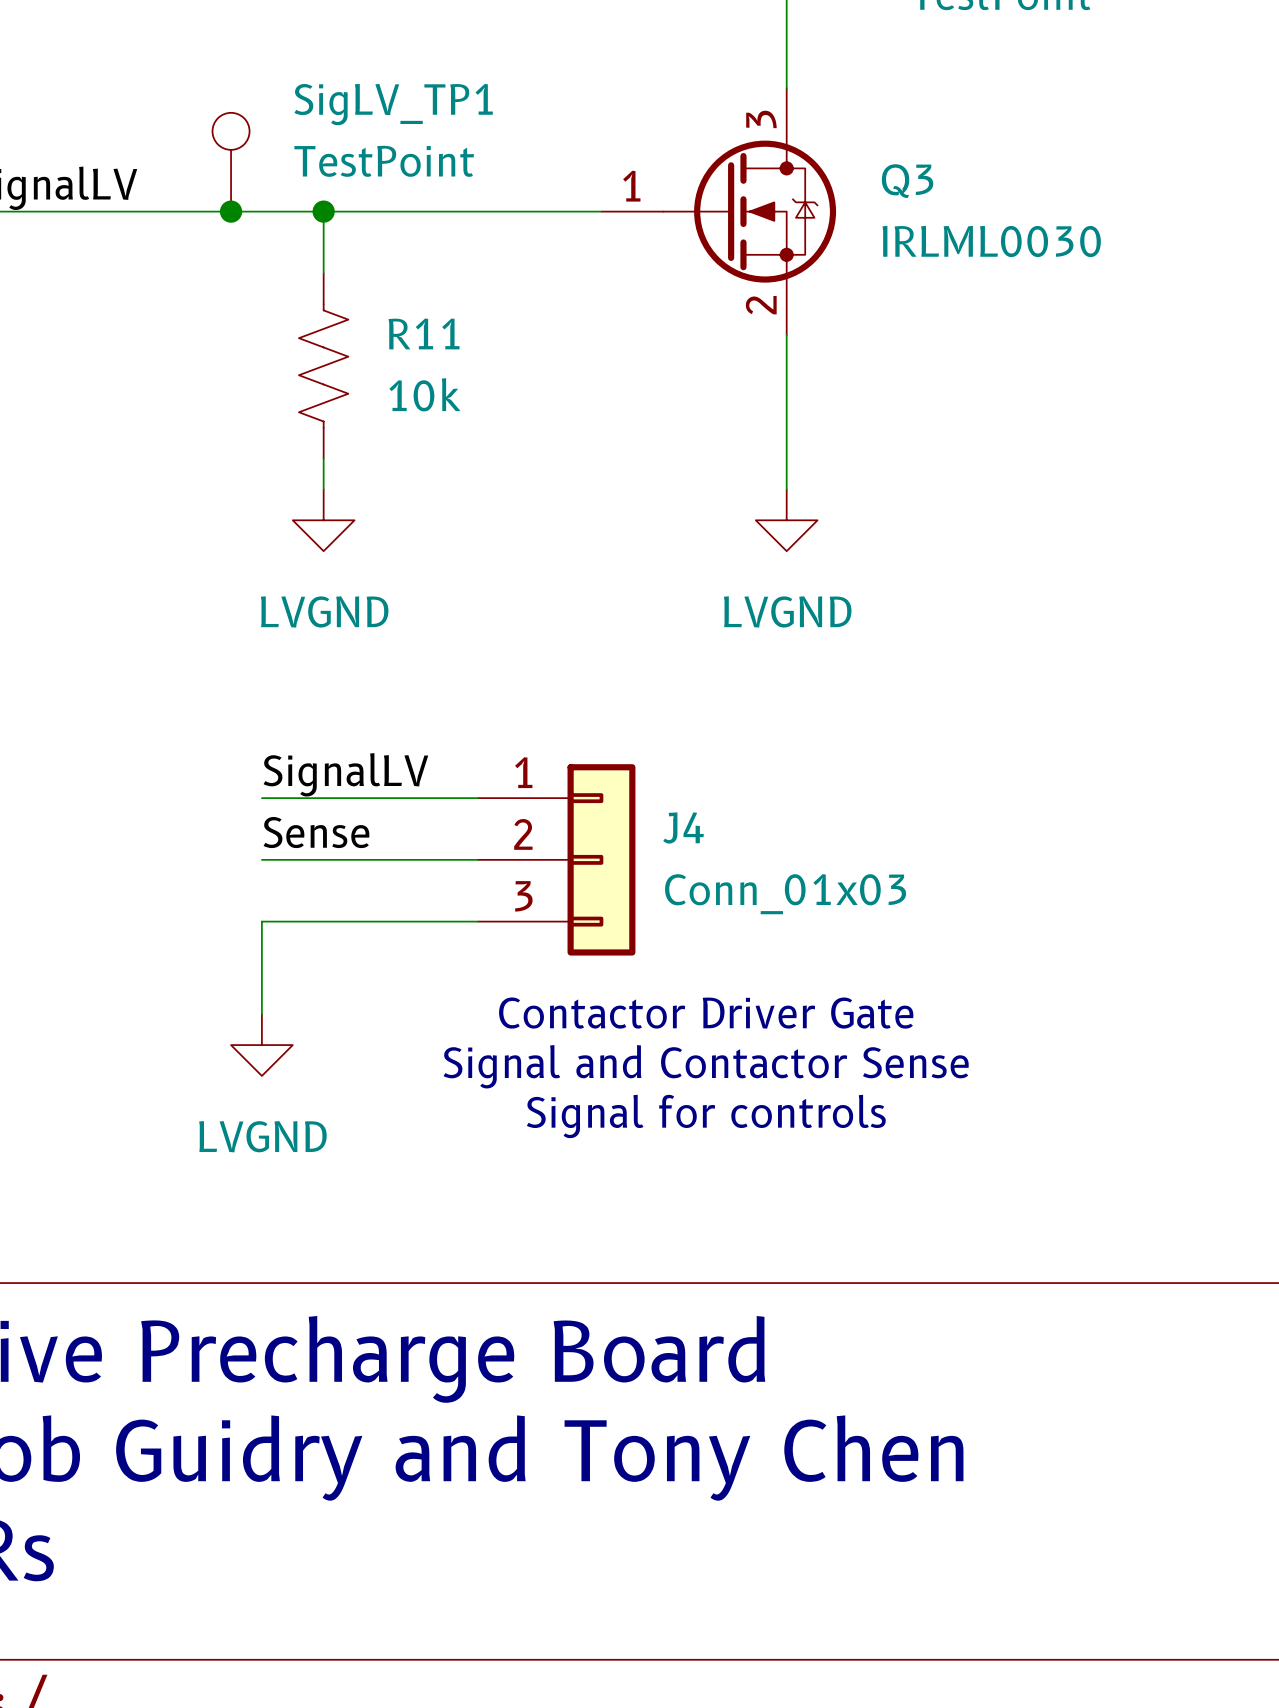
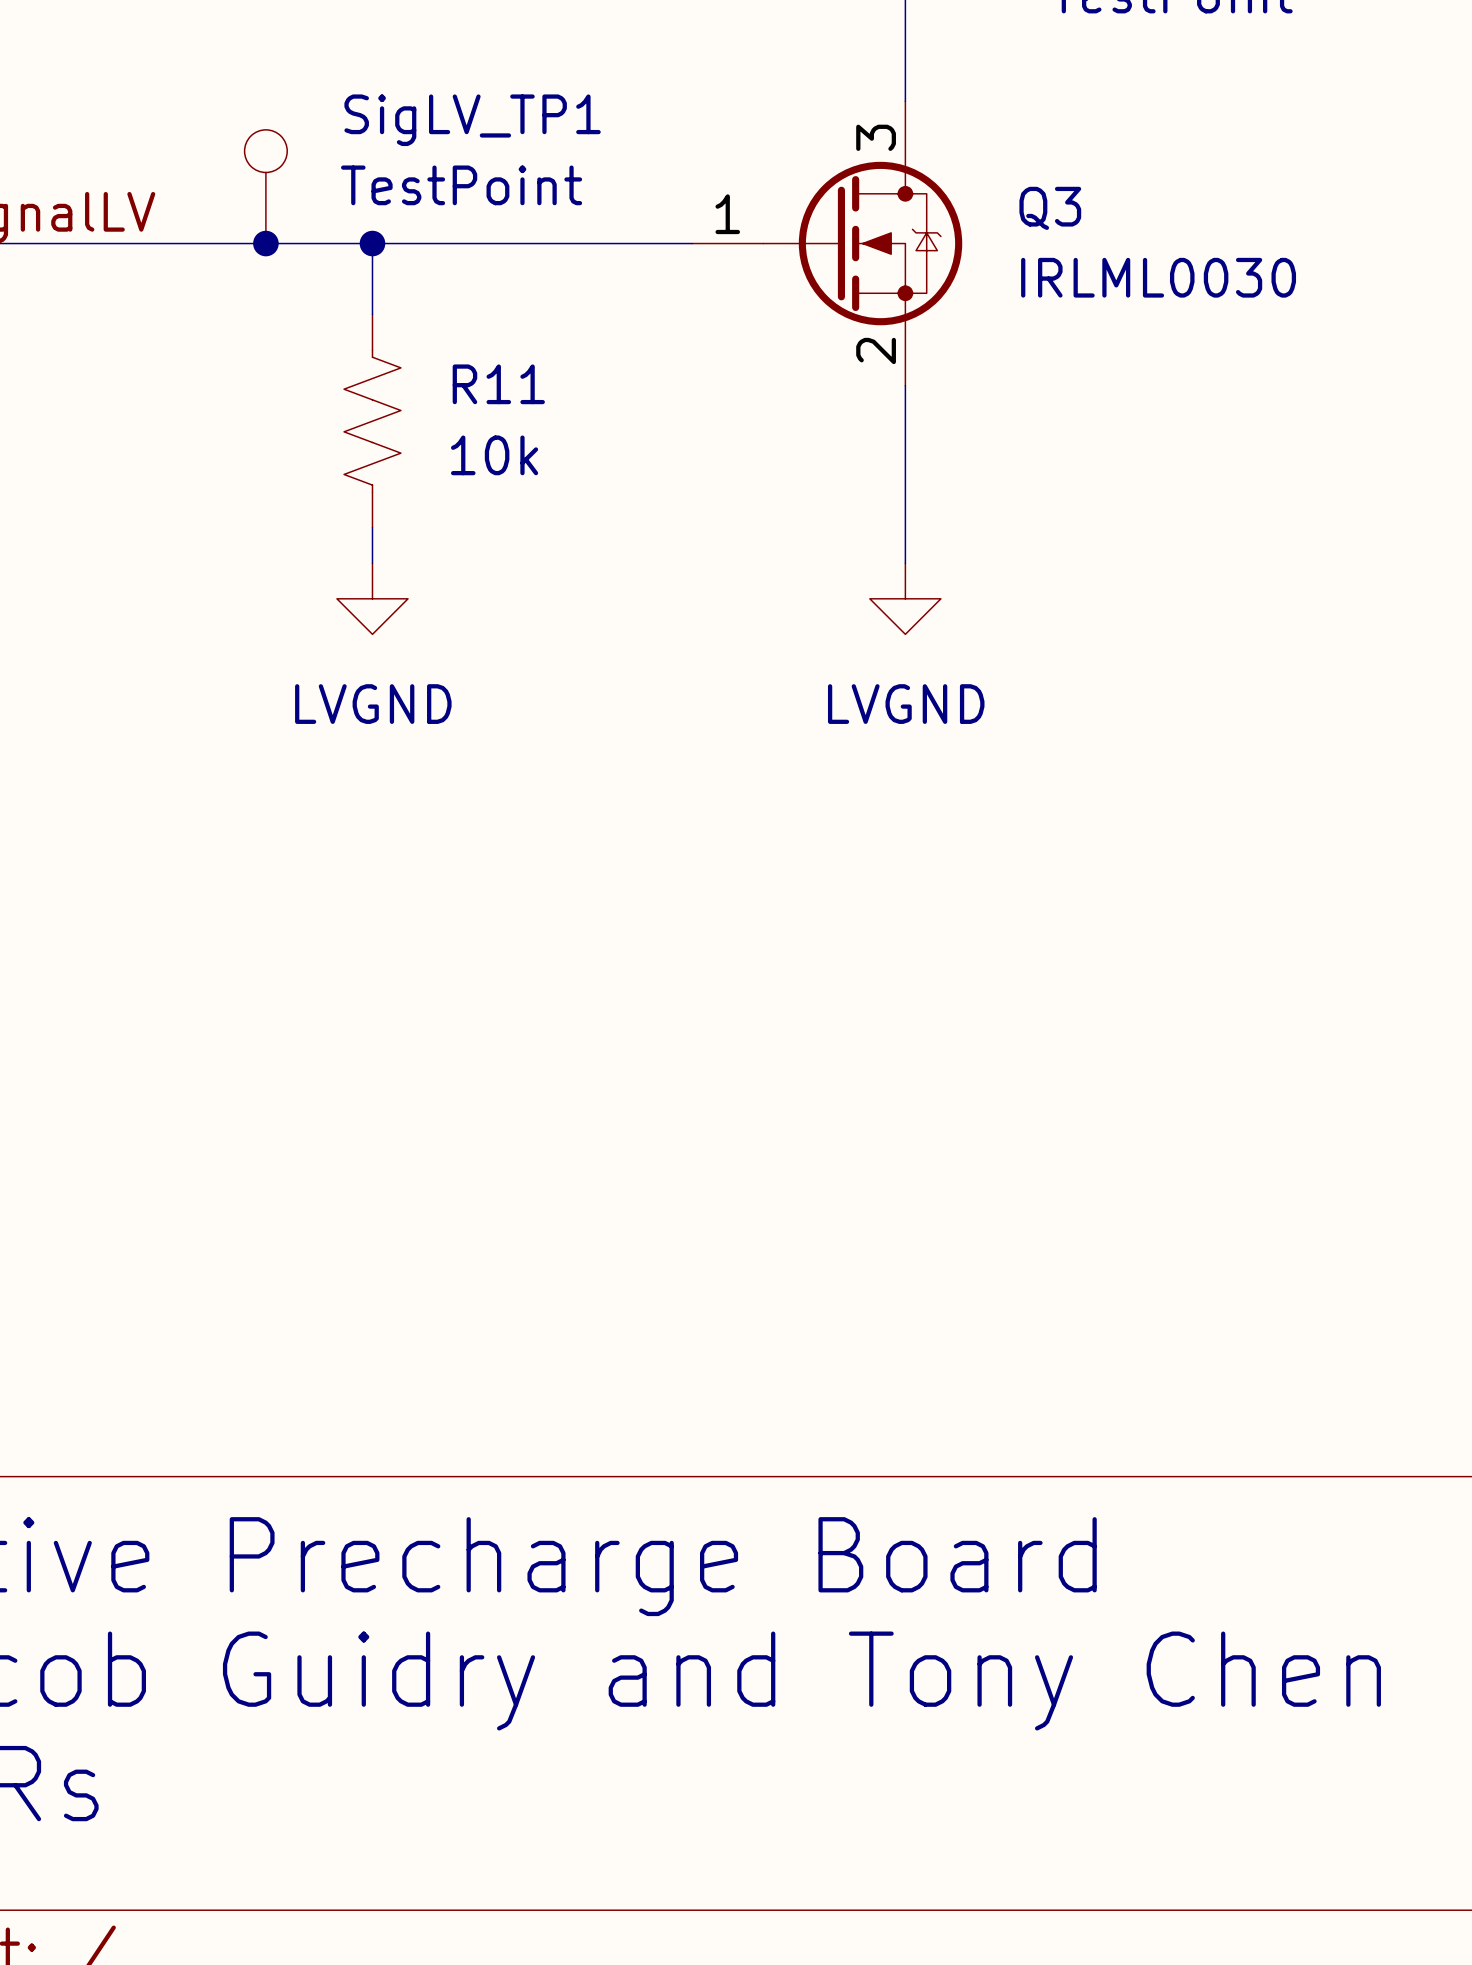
label: SignalLV (345, 774) -> none
wire: (261, 798) (478, 798) -> none
label: Sense (316, 832) -> none
wire: (261, 859) (478, 859) -> none
J4: Conn_01x03 (556, 859) -> none
wire: (478, 921) (261, 921) (261, 1014) -> none
text: Contactor Driver Gate (706, 1013) -> none
power symbol: LVGND (261, 1045) -> none
text: Signal and Contactor Sense (706, 1066) -> none
text: Signal for controls (706, 1116) -> none

